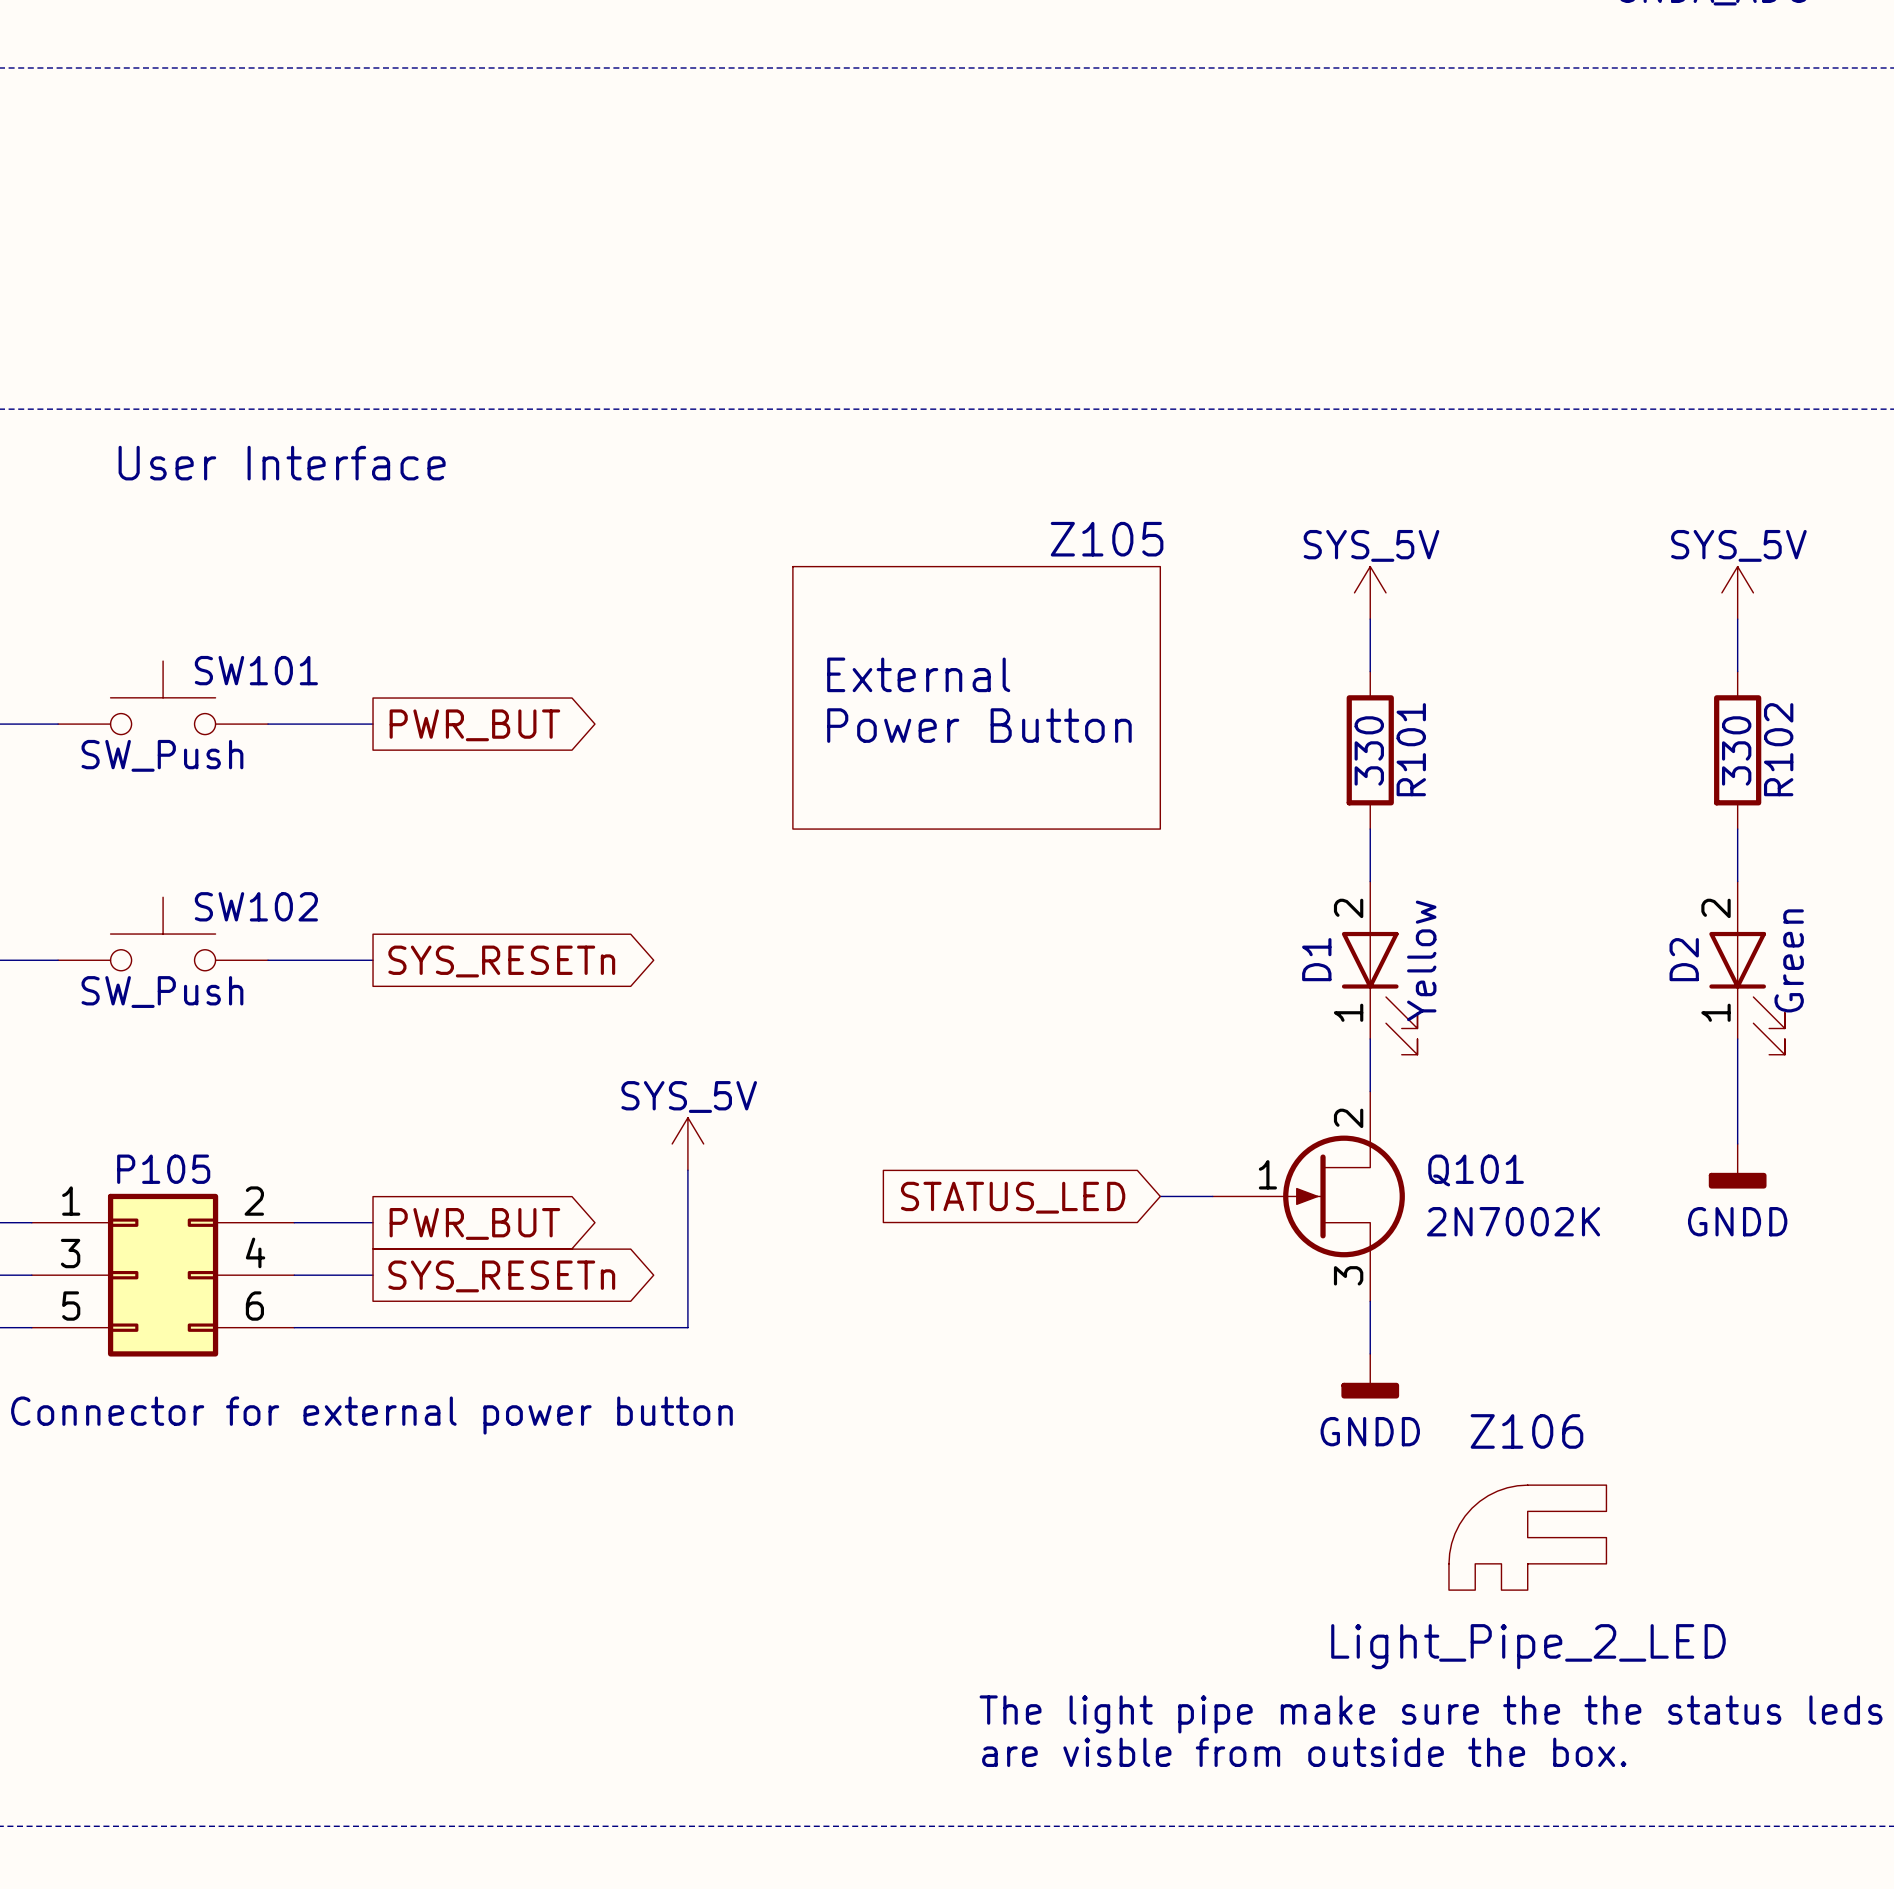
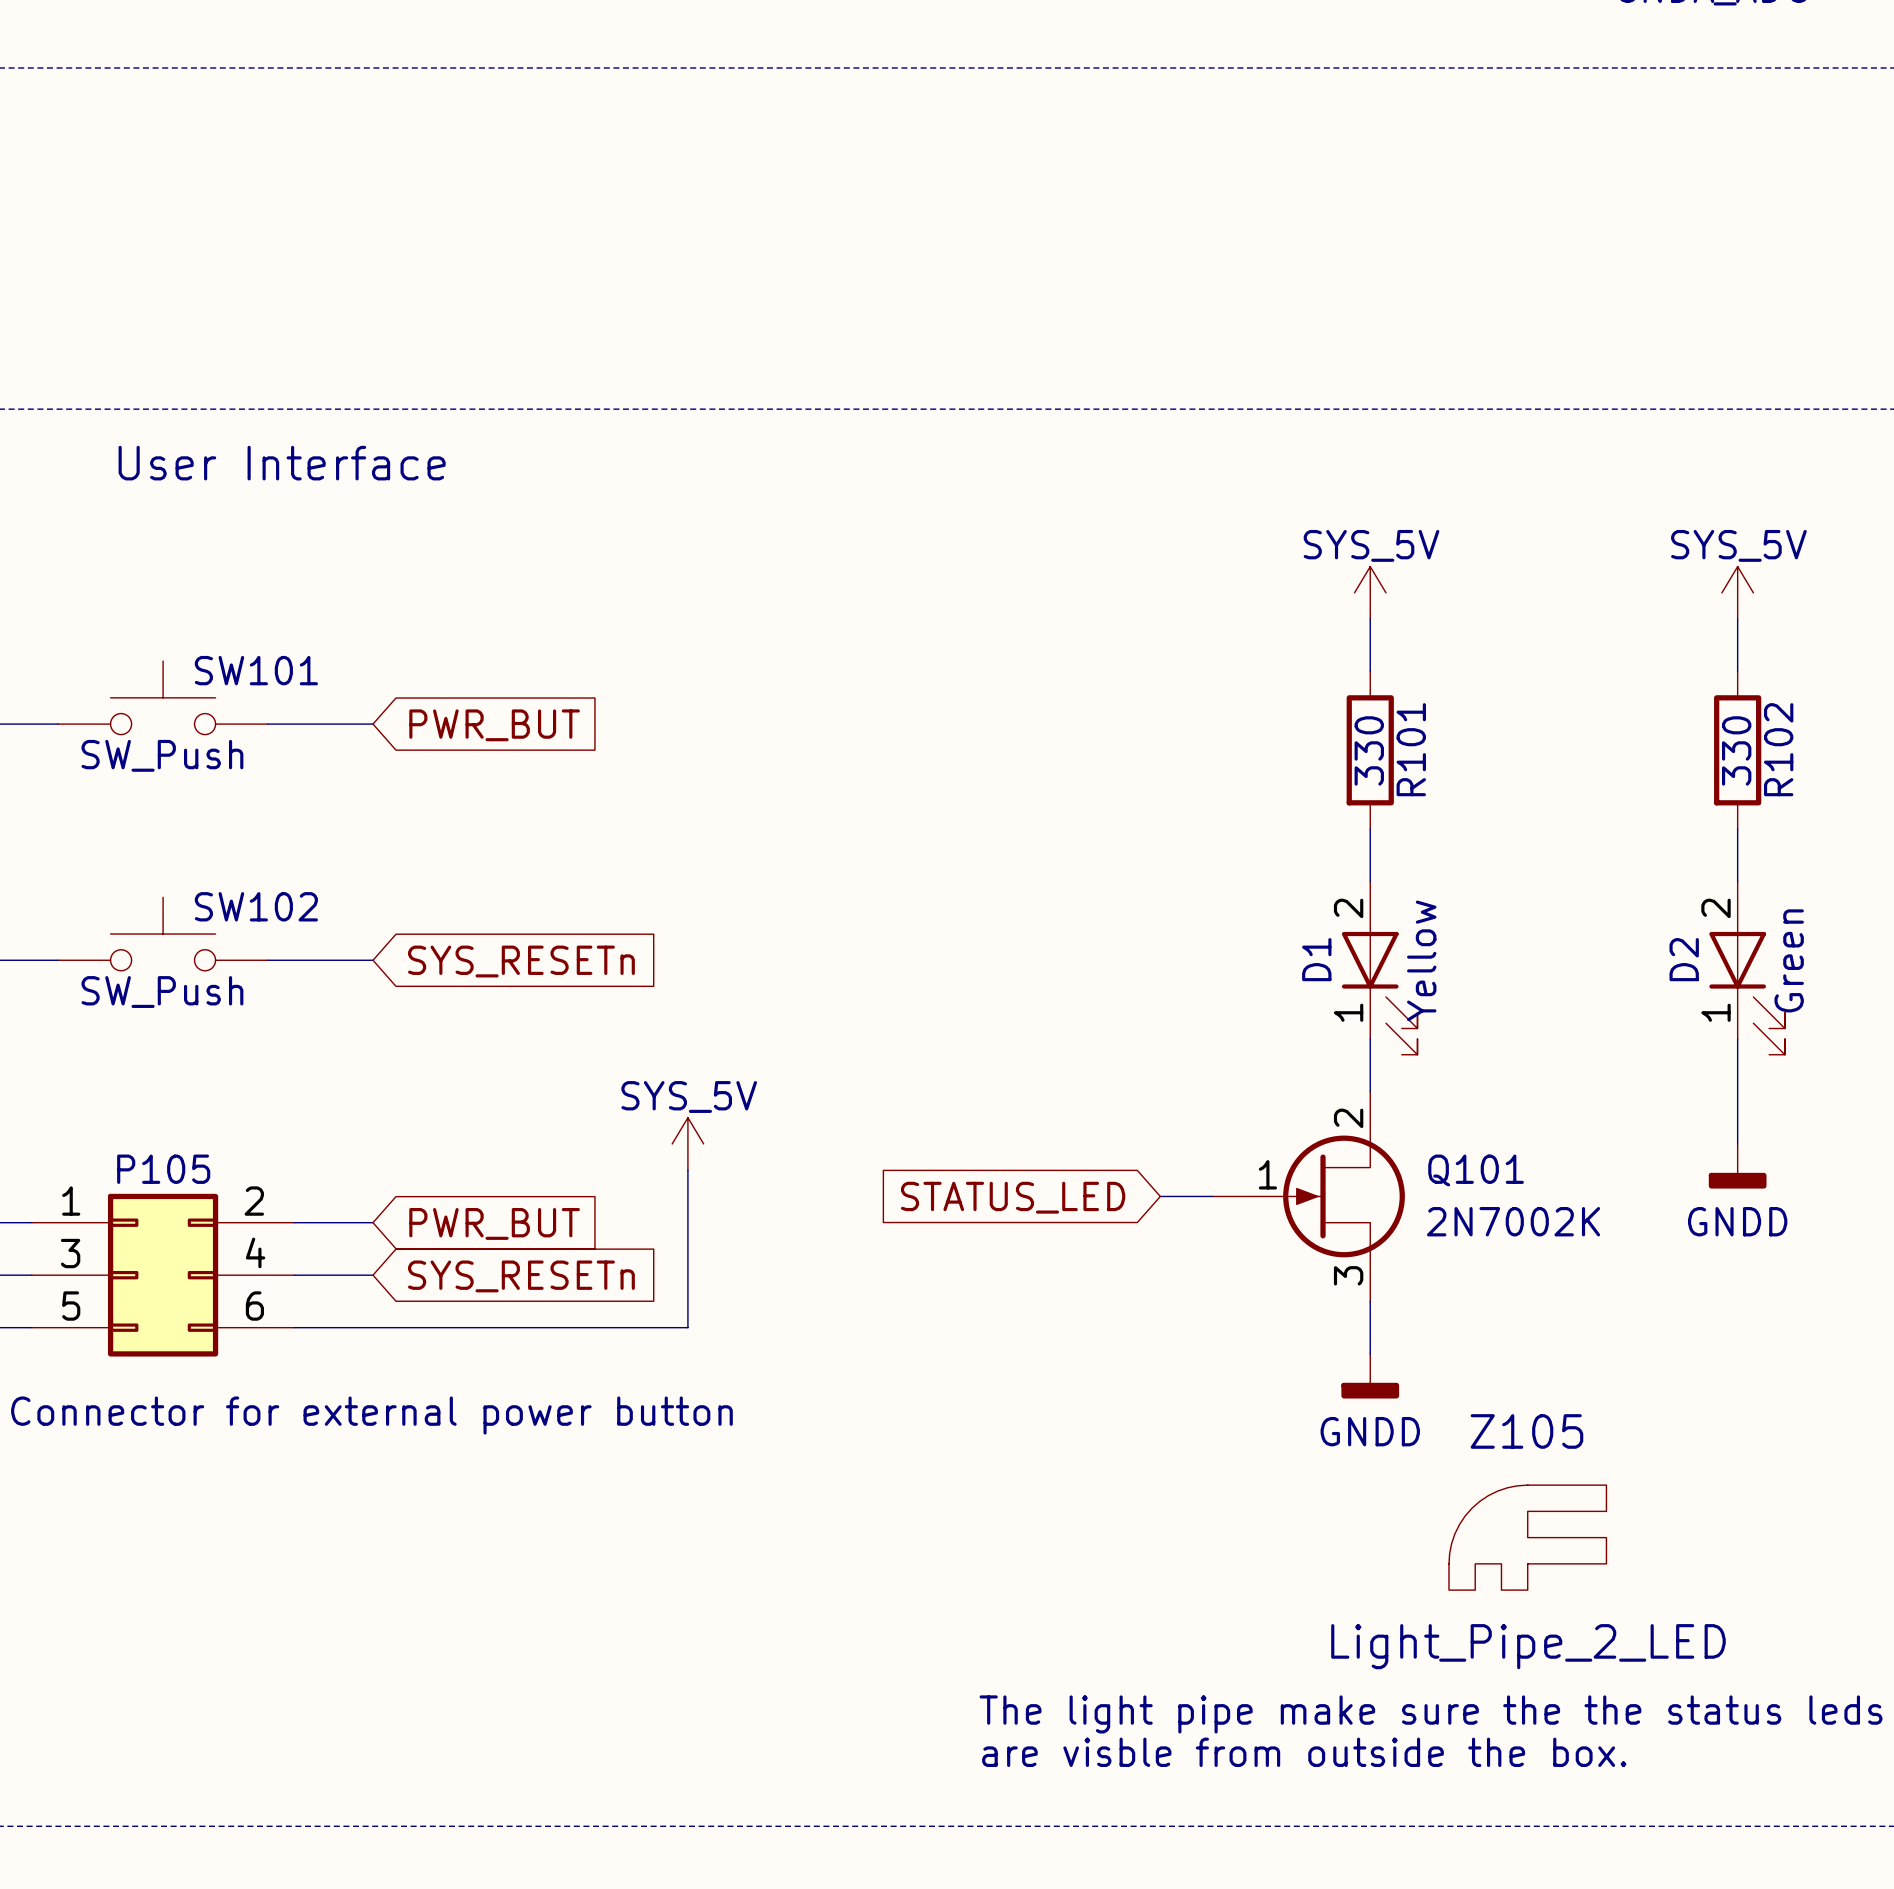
text: External (918, 674) -> none
Z105: (976, 697) -> none
global label shape: output (474, 725) -> input (494, 725)
text: Power Button (979, 725) -> none
global label shape: output (501, 961) -> input (521, 961)
global label shape: output (474, 1223) -> input (494, 1223)
global label shape: output (501, 1276) -> input (521, 1276)
Z106 name: Z106 (1526, 1431) -> Z105 (1526, 1431)

